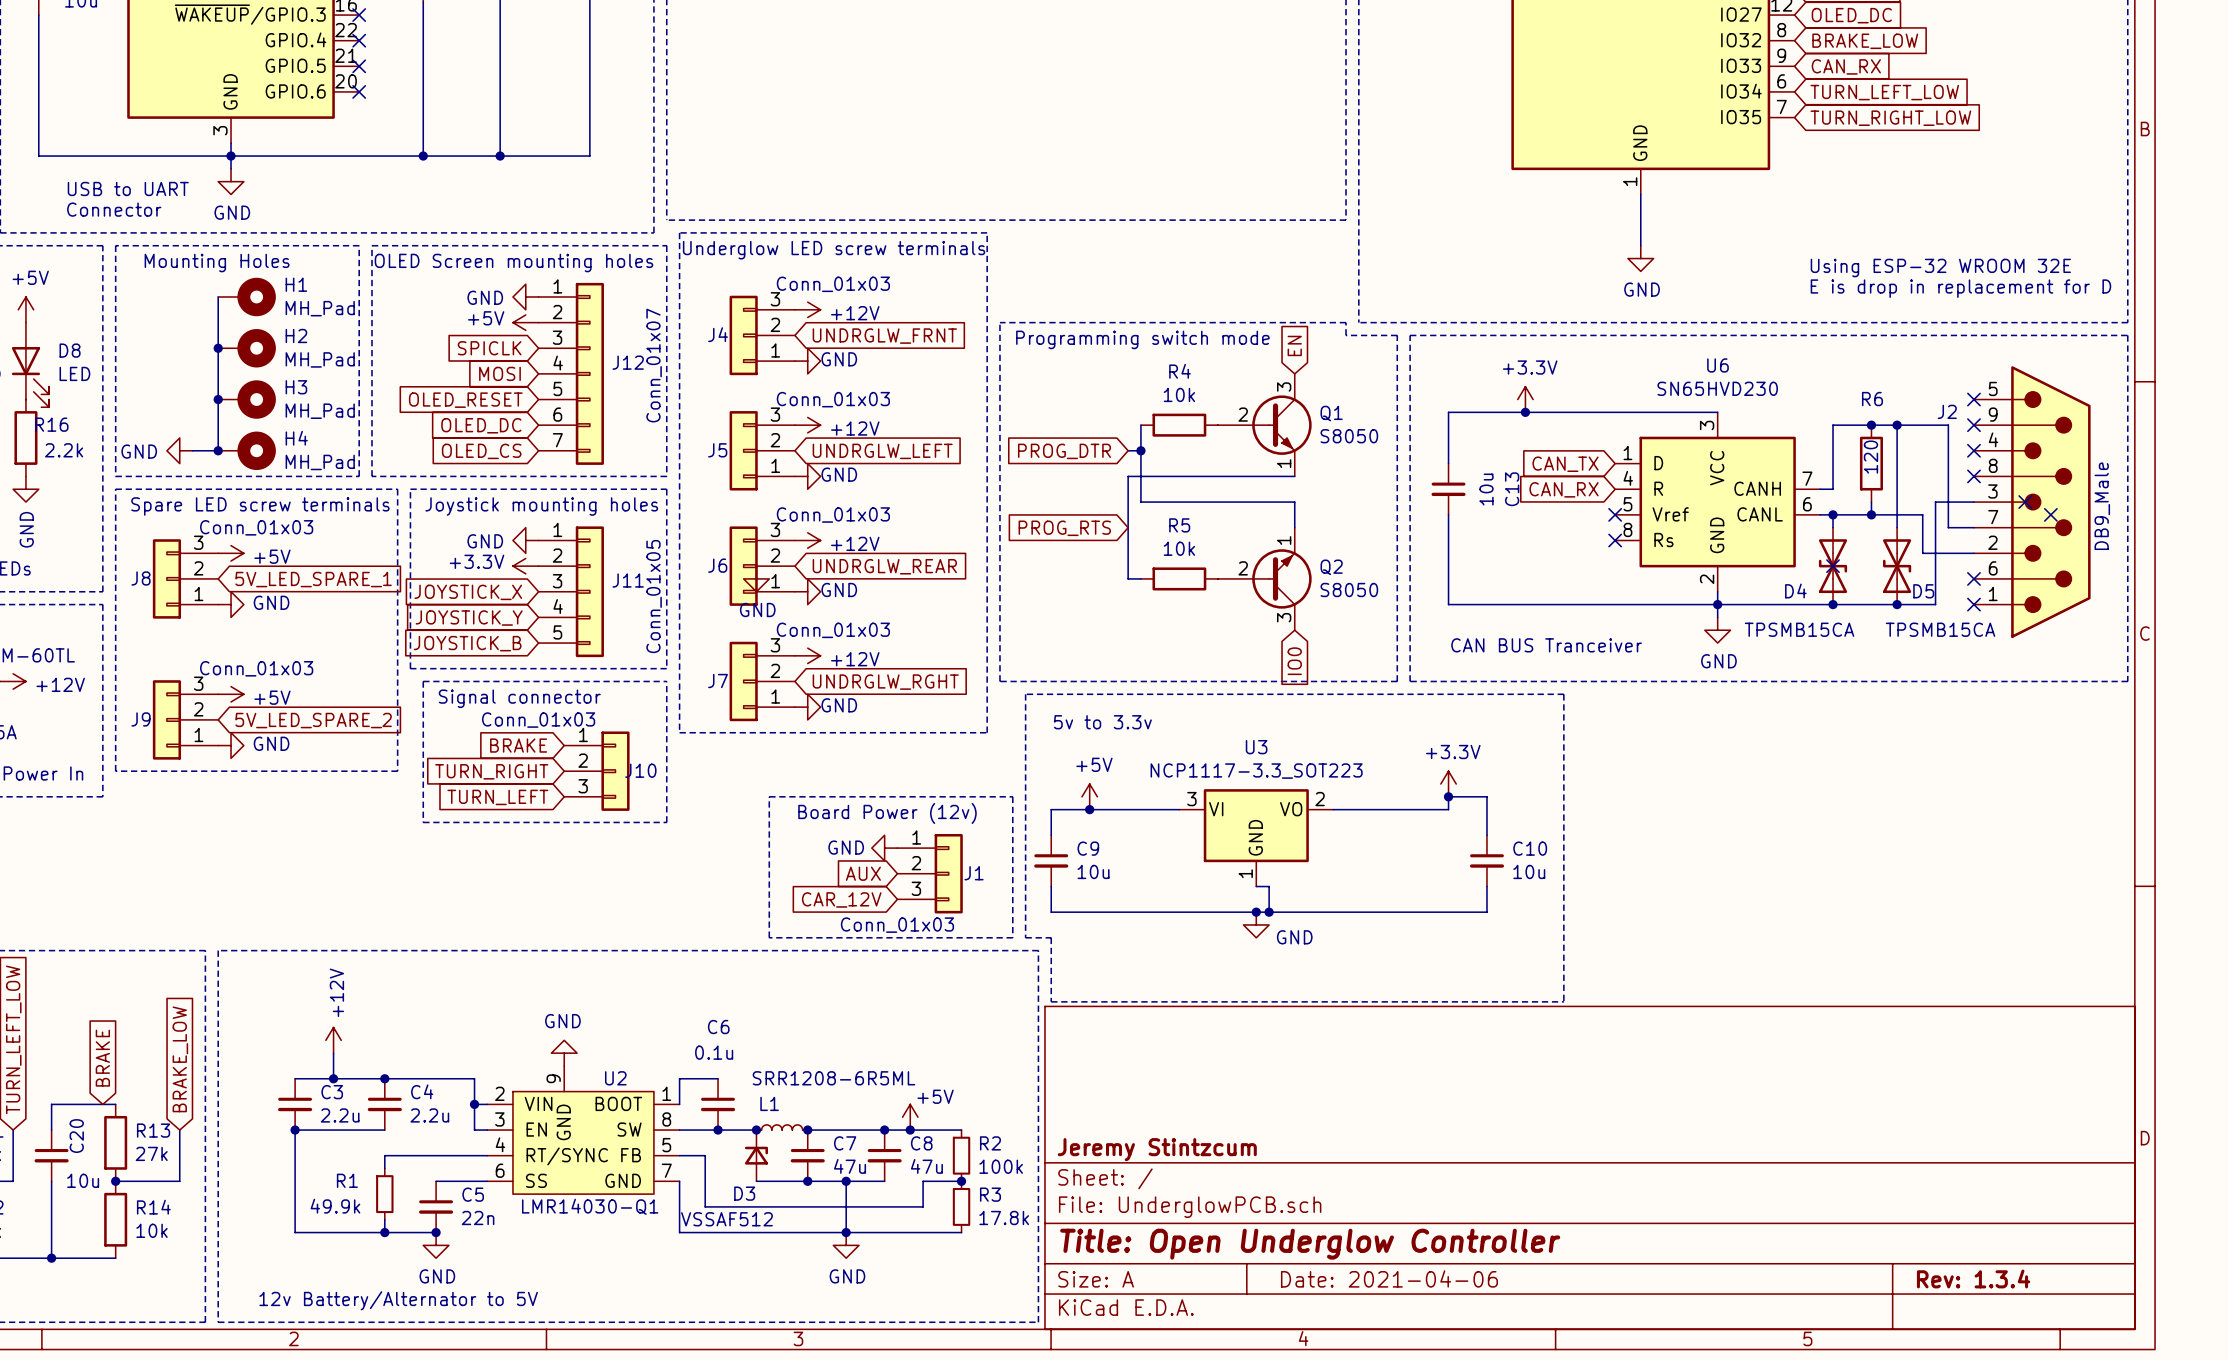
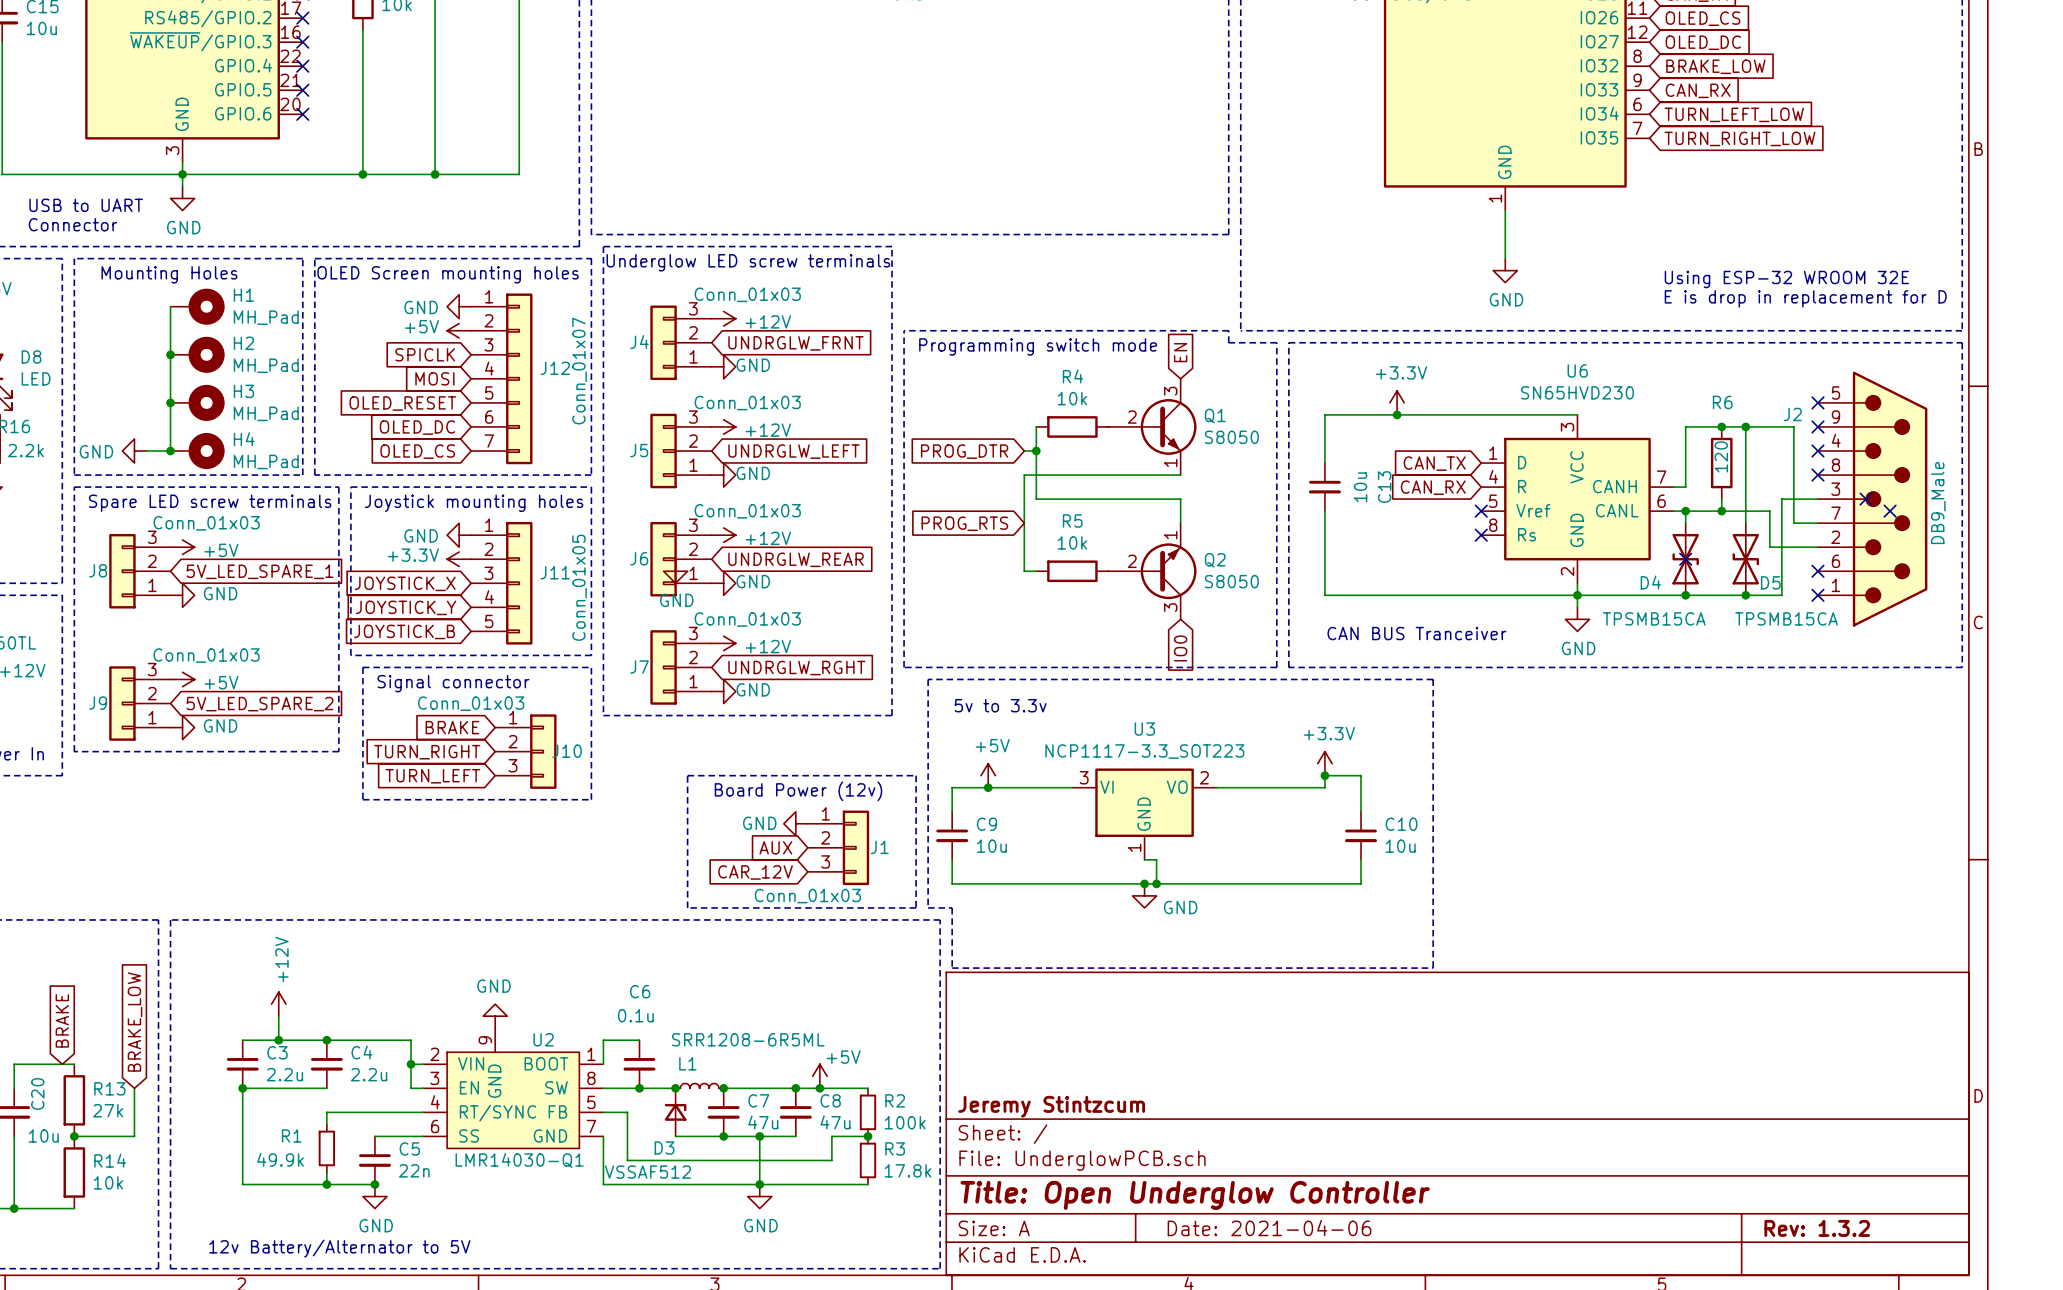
title block: Rev: 1.3.4 (1973, 1278) -> Rev: 1.3.2 (1817, 1228)

